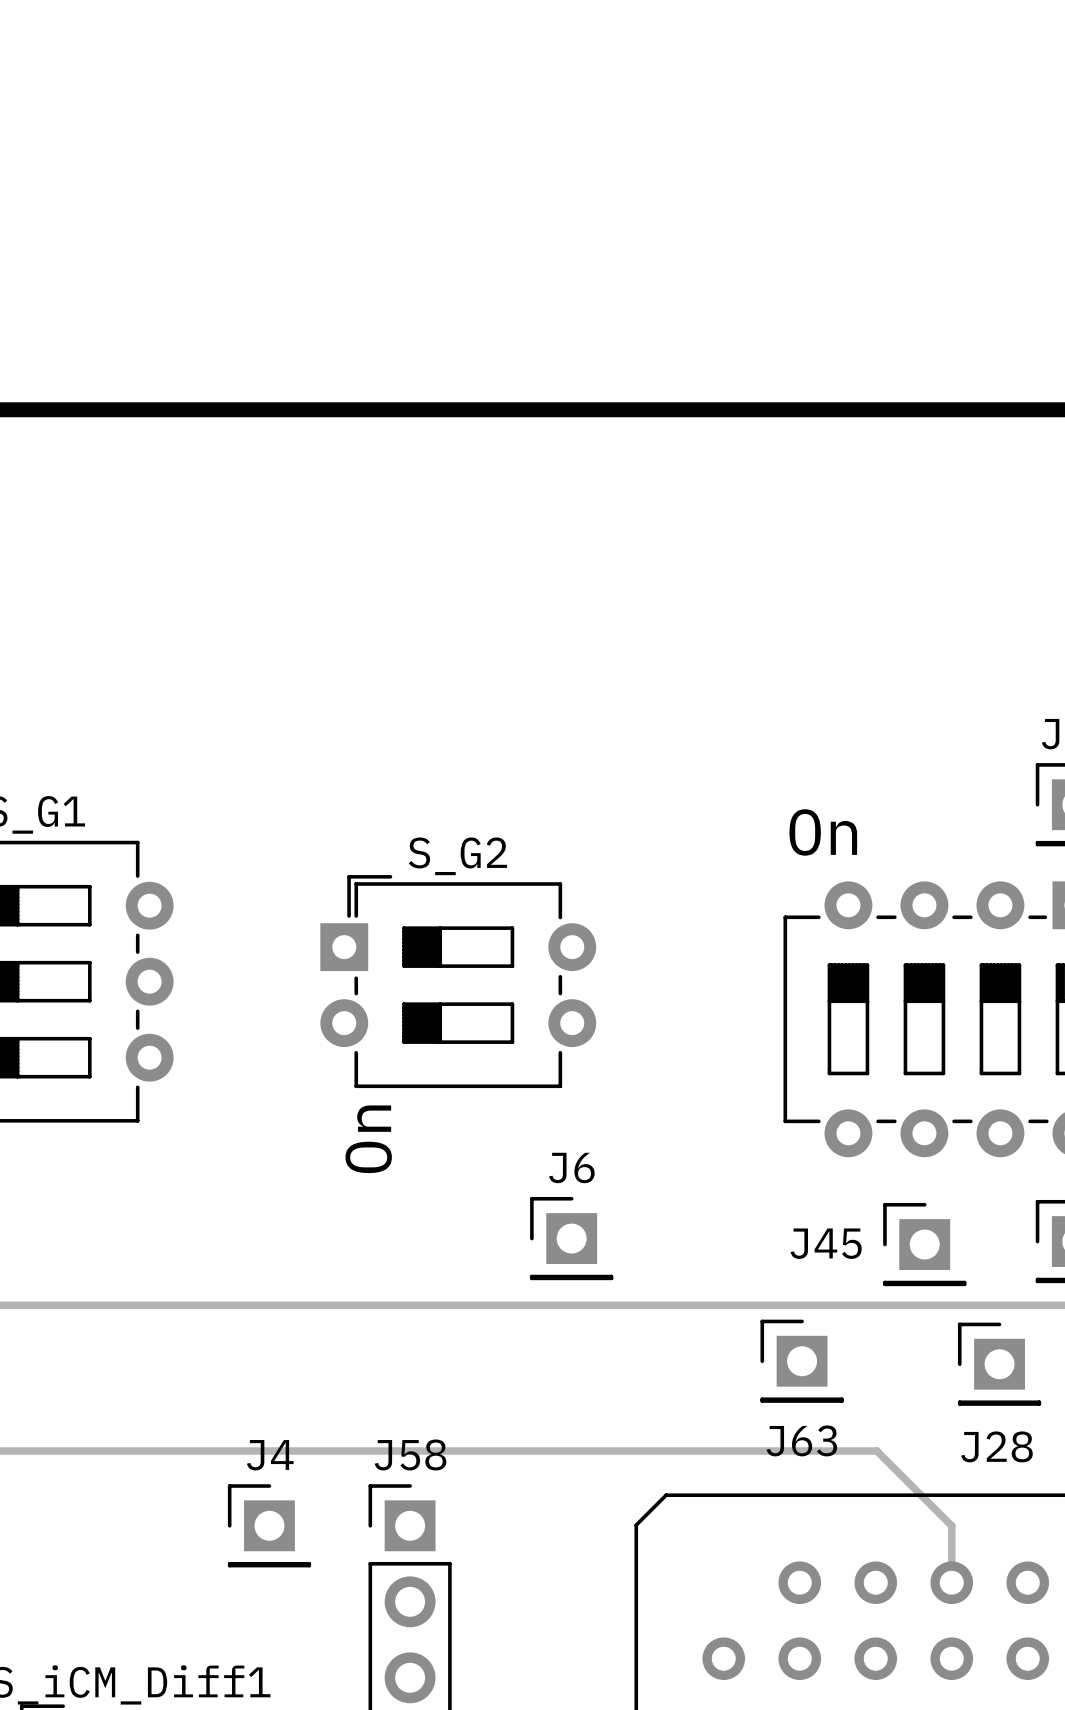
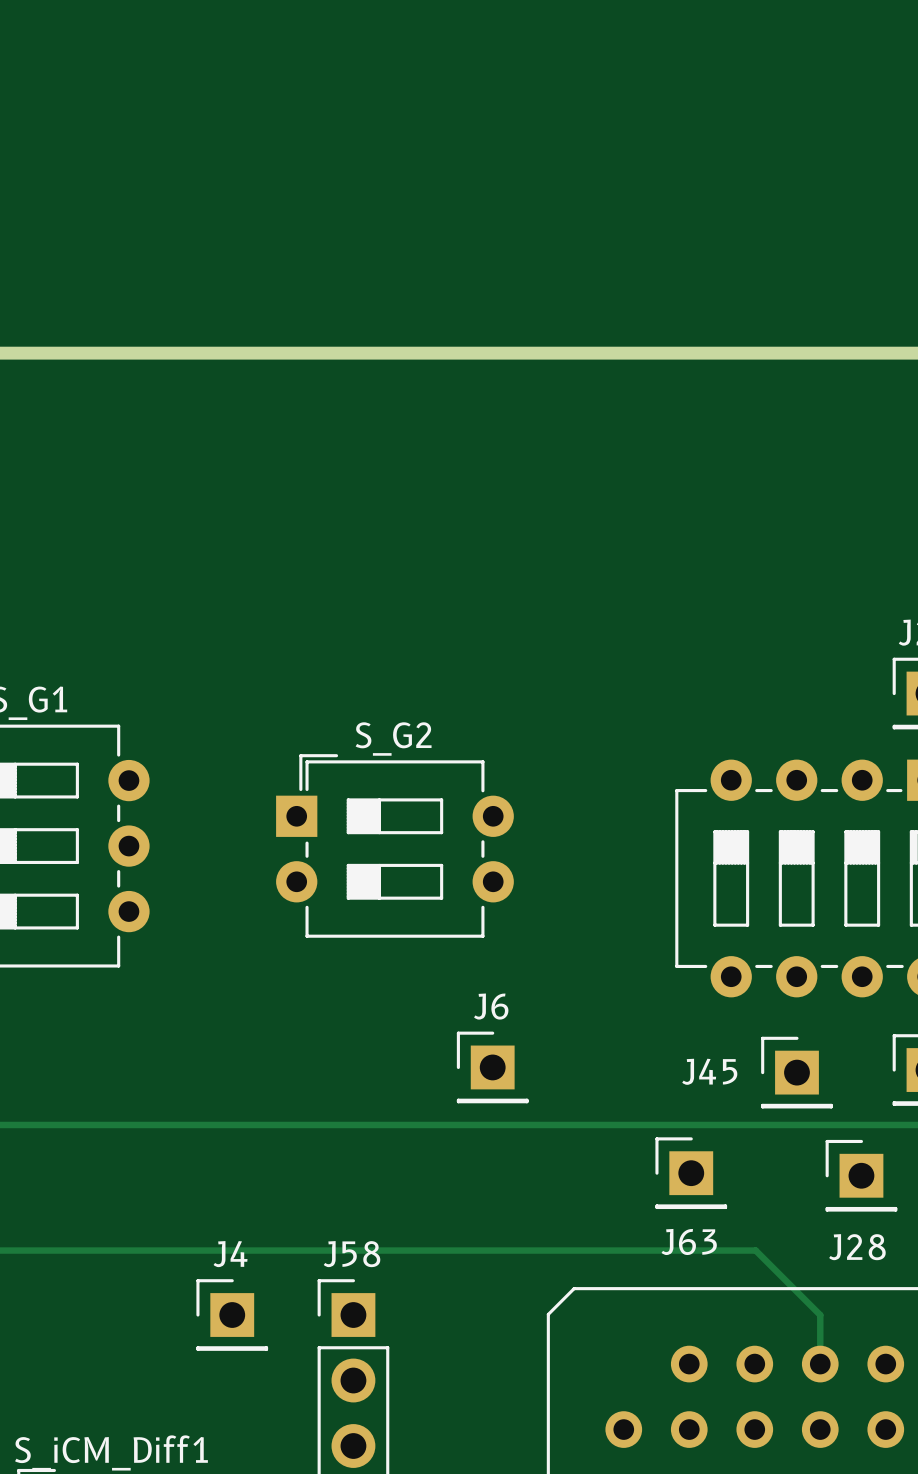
text: On (823, 832) -> none
text: On (368, 1139) -> none

